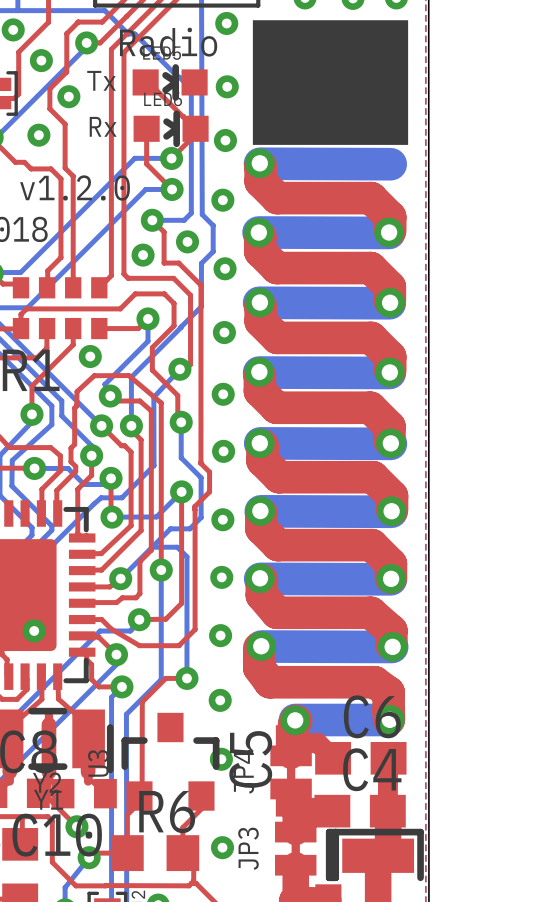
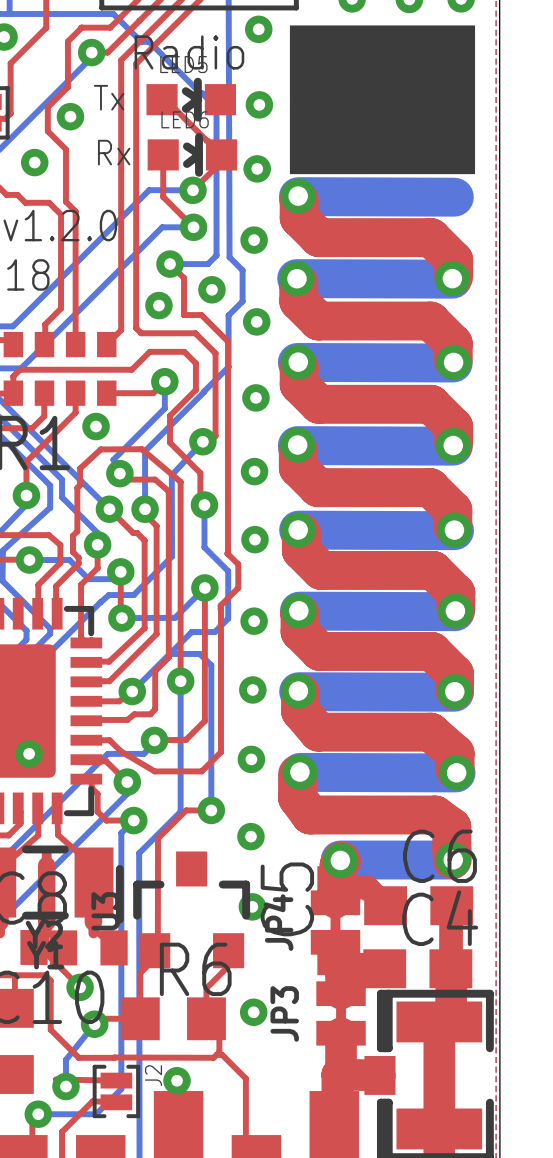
via: (41, 60) -> none

